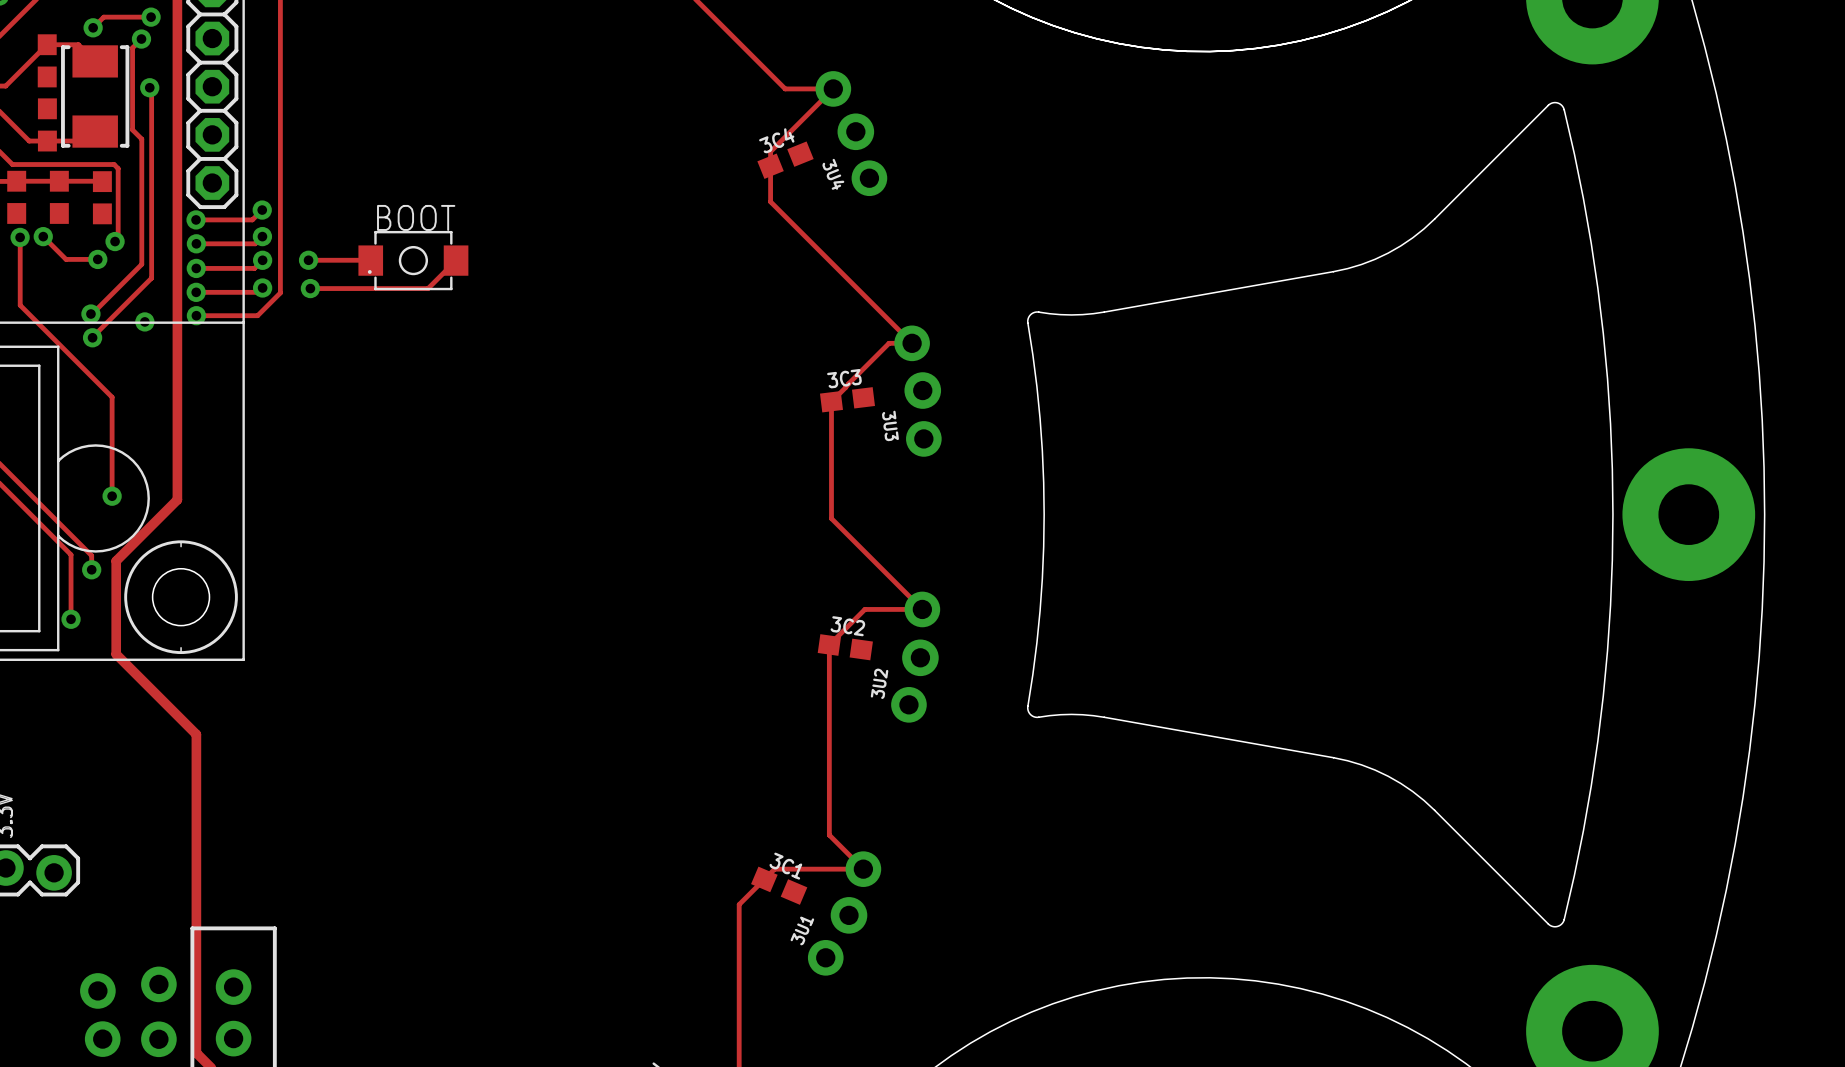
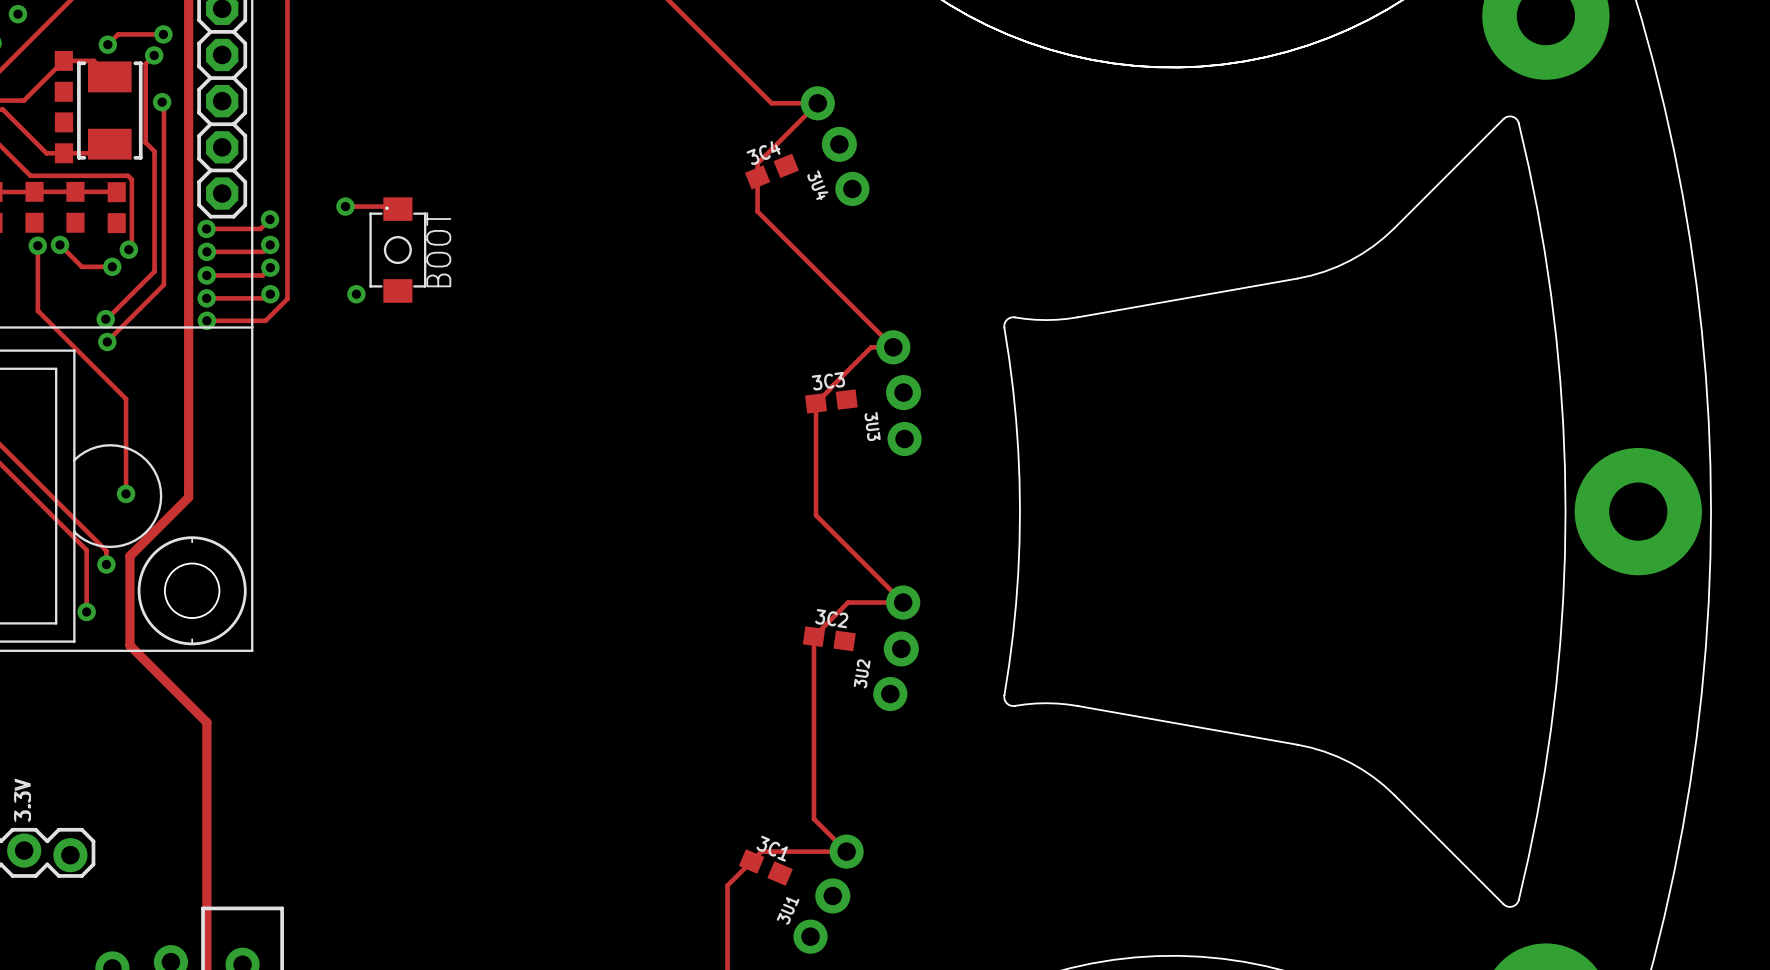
track: none -> (345, 206) (395, 206) (397, 209)
via: none -> (345, 206)
track: (308, 260) (370, 260) -> none
via: (308, 260) -> none
BOOT rotation: 0° (413, 260) -> 90° clockwise (397, 250)
track: (456, 260) (428, 288) (310, 288) -> none
via: none -> (356, 294)
via: (310, 288) -> none
via: (144, 321) -> none

